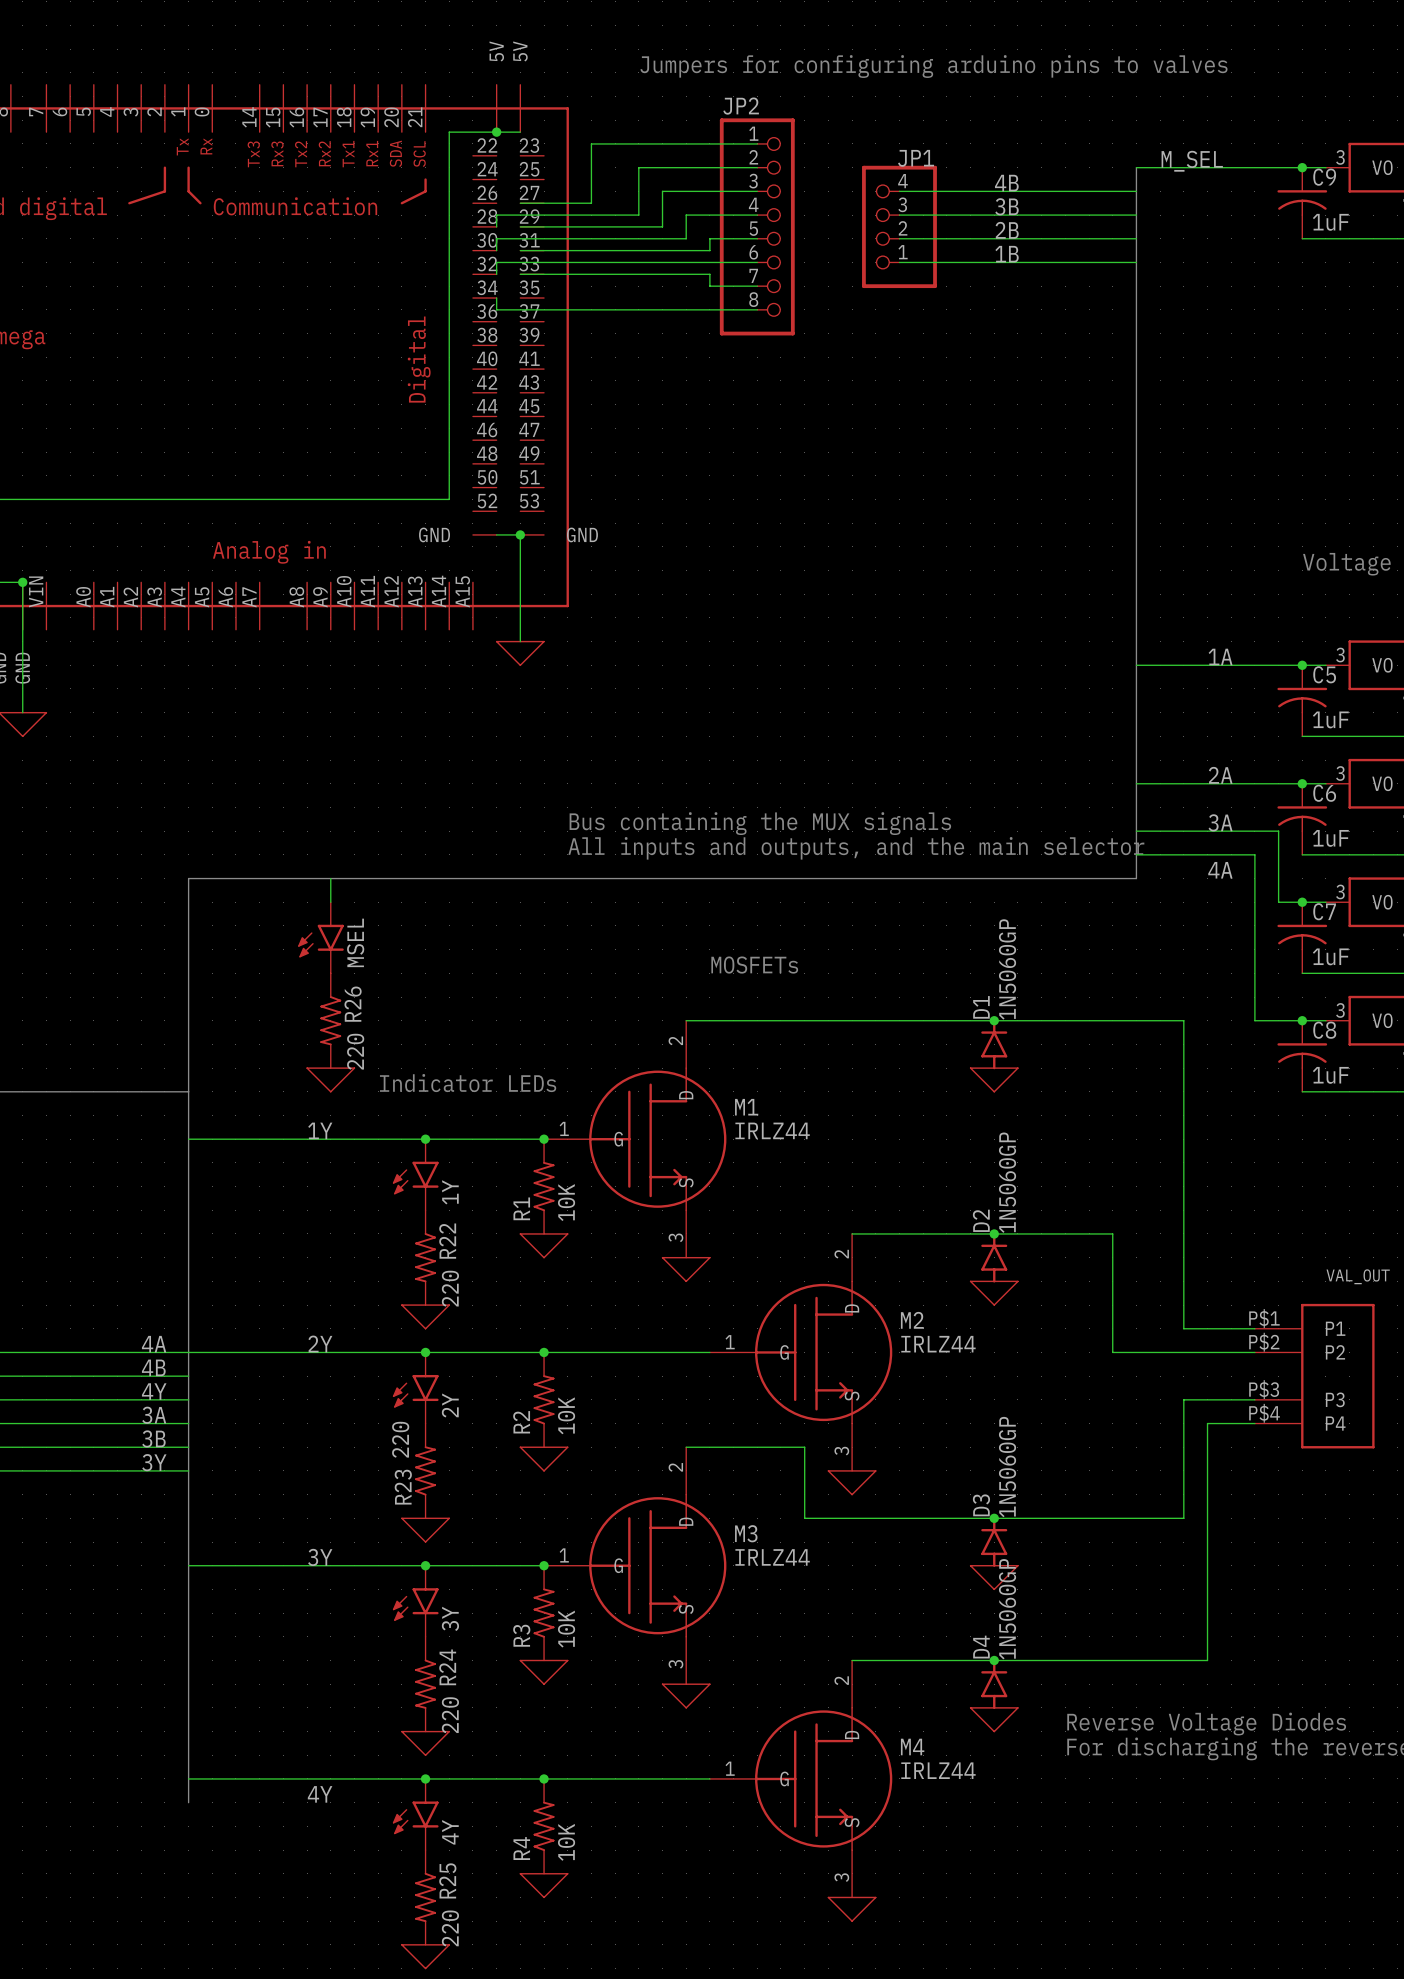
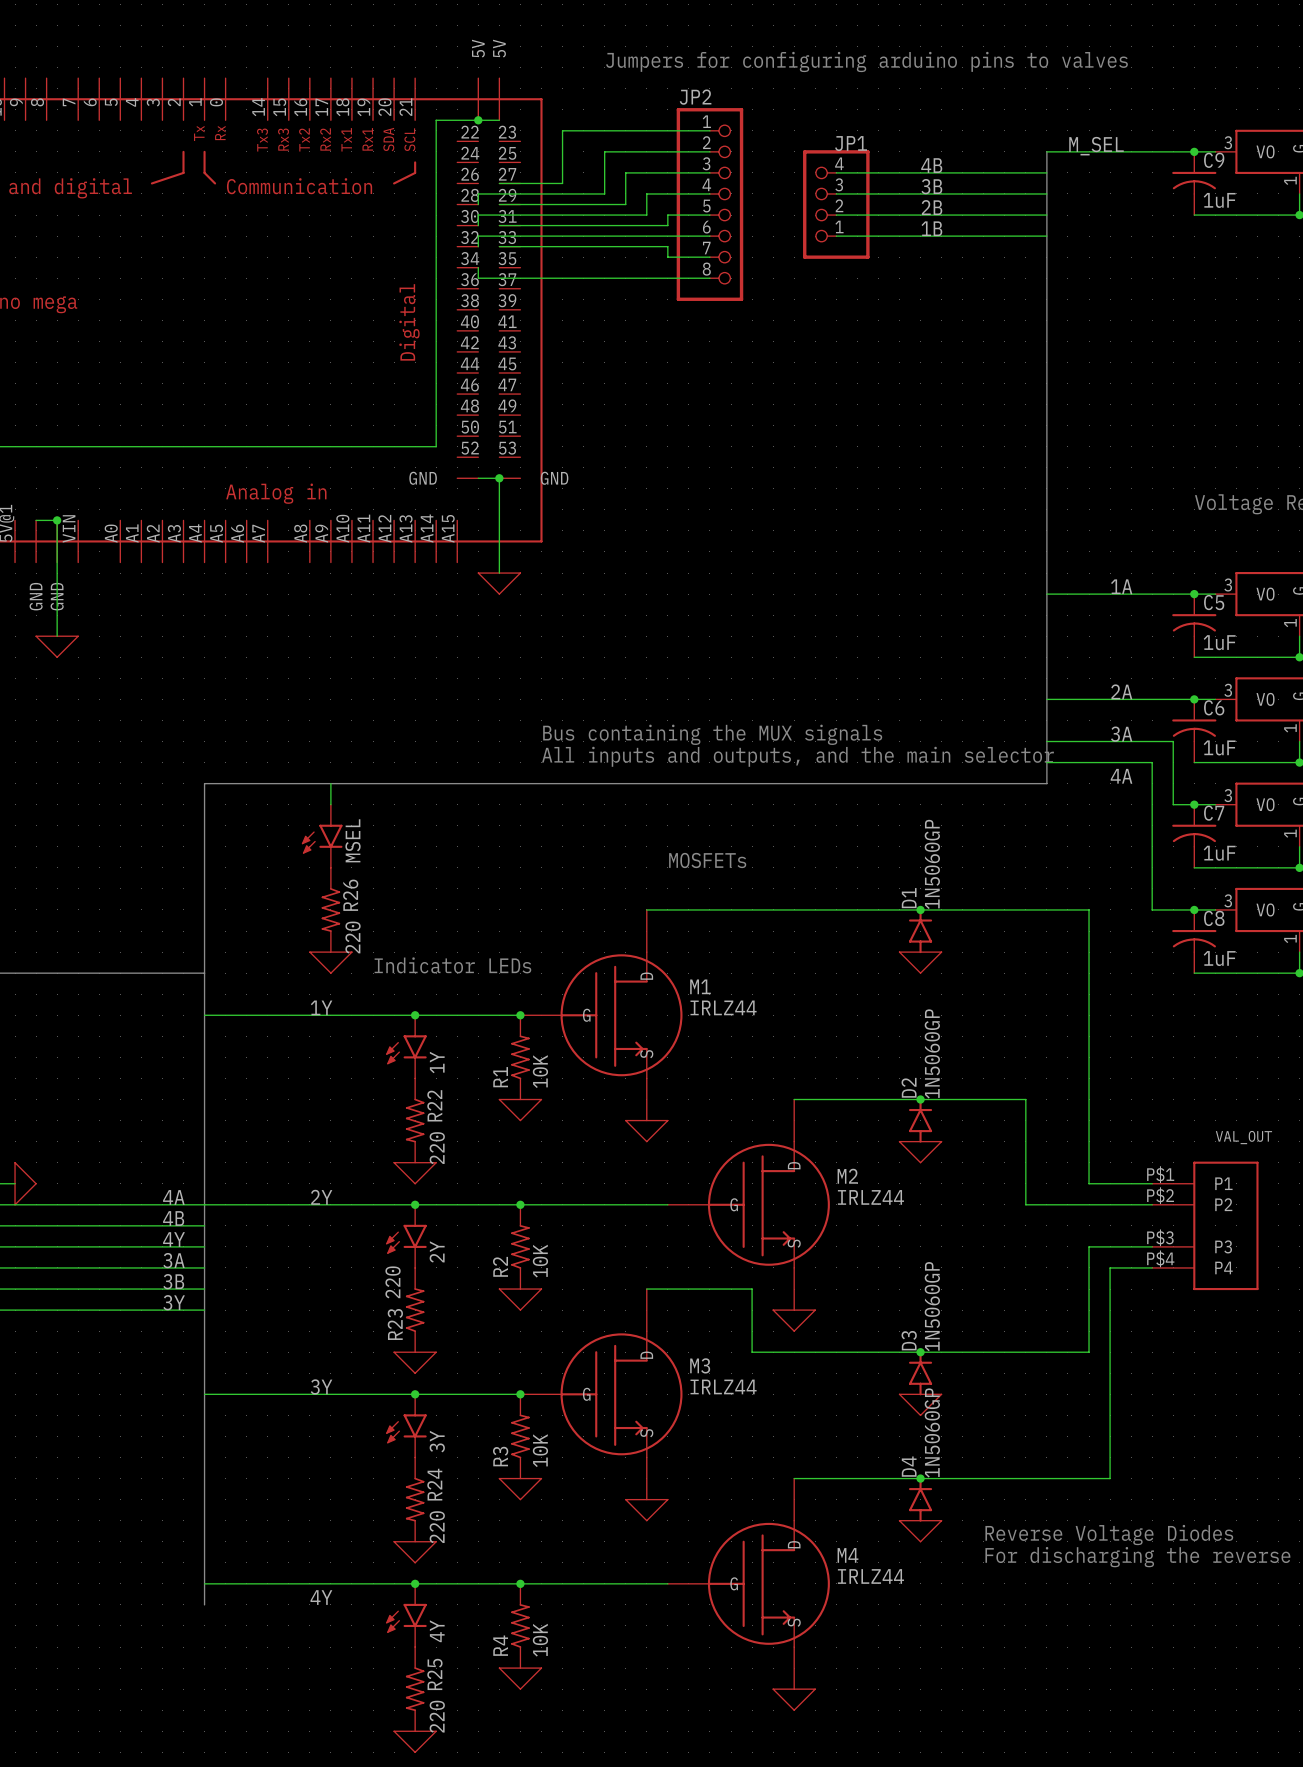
M1 pin number: 2 (675, 1040) -> none
M1 pin number: 1 (564, 1128) -> none
M1 pin number: 3 (675, 1237) -> none
M2 pin number: 2 (841, 1254) -> none
M2 pin number: 1 (730, 1342) -> none
M2 pin number: 3 (841, 1451) -> none
M3 pin number: 2 (675, 1467) -> none
M3 pin number: 1 (564, 1555) -> none
M3 pin number: 3 (675, 1664) -> none
M4 pin number: 2 (841, 1680) -> none
M4 pin number: 1 (730, 1768) -> none
M4 pin number: 3 (841, 1877) -> none

